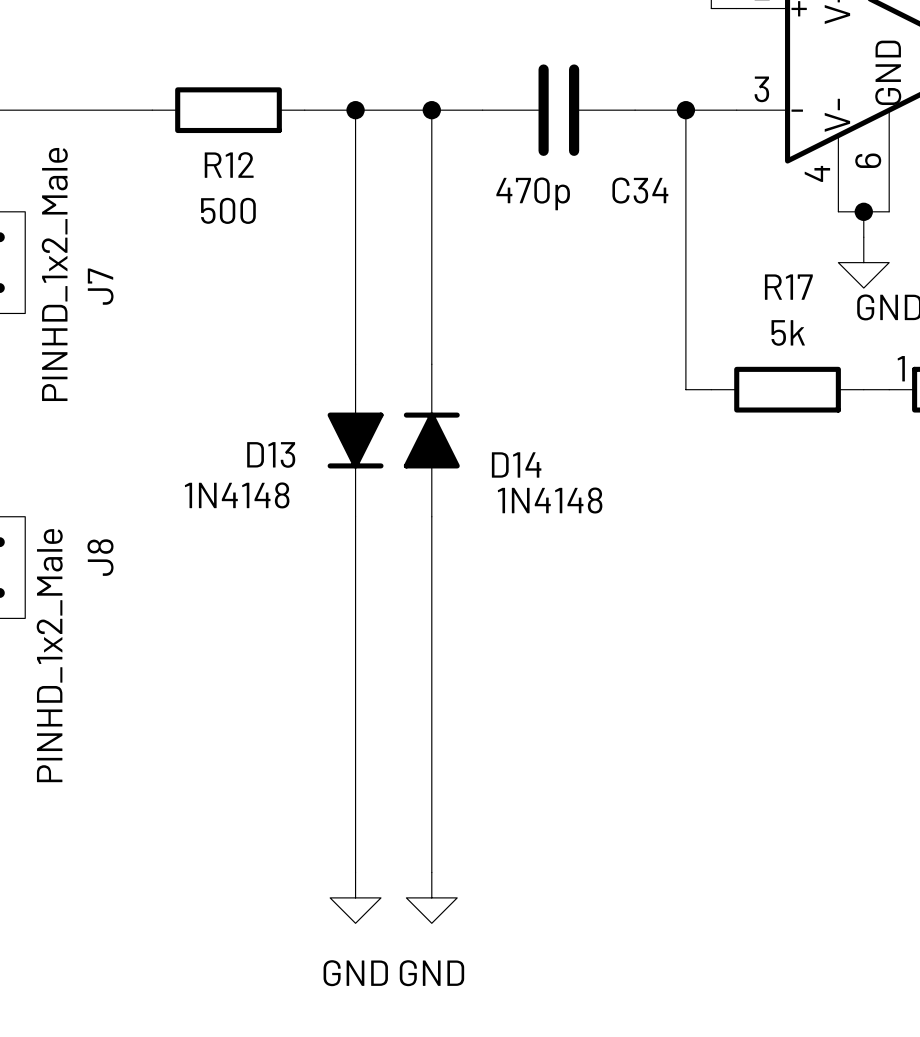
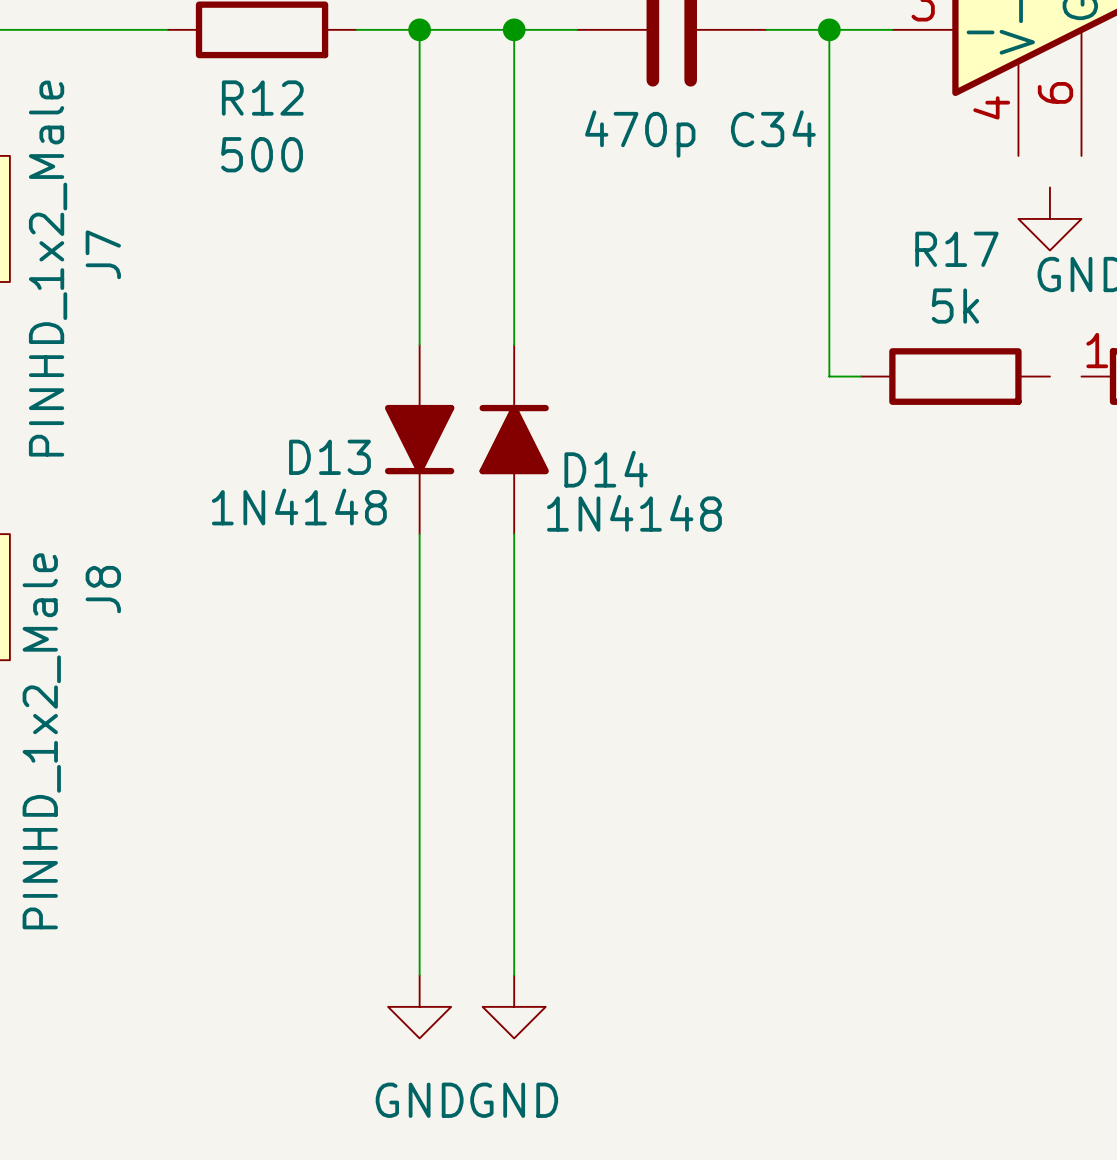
wire: (838, 211) (889, 211) -> none
wire: (863, 211) (863, 237) -> none
junction: (863, 211) -> none
wire: (863, 389) (889, 389) -> none

